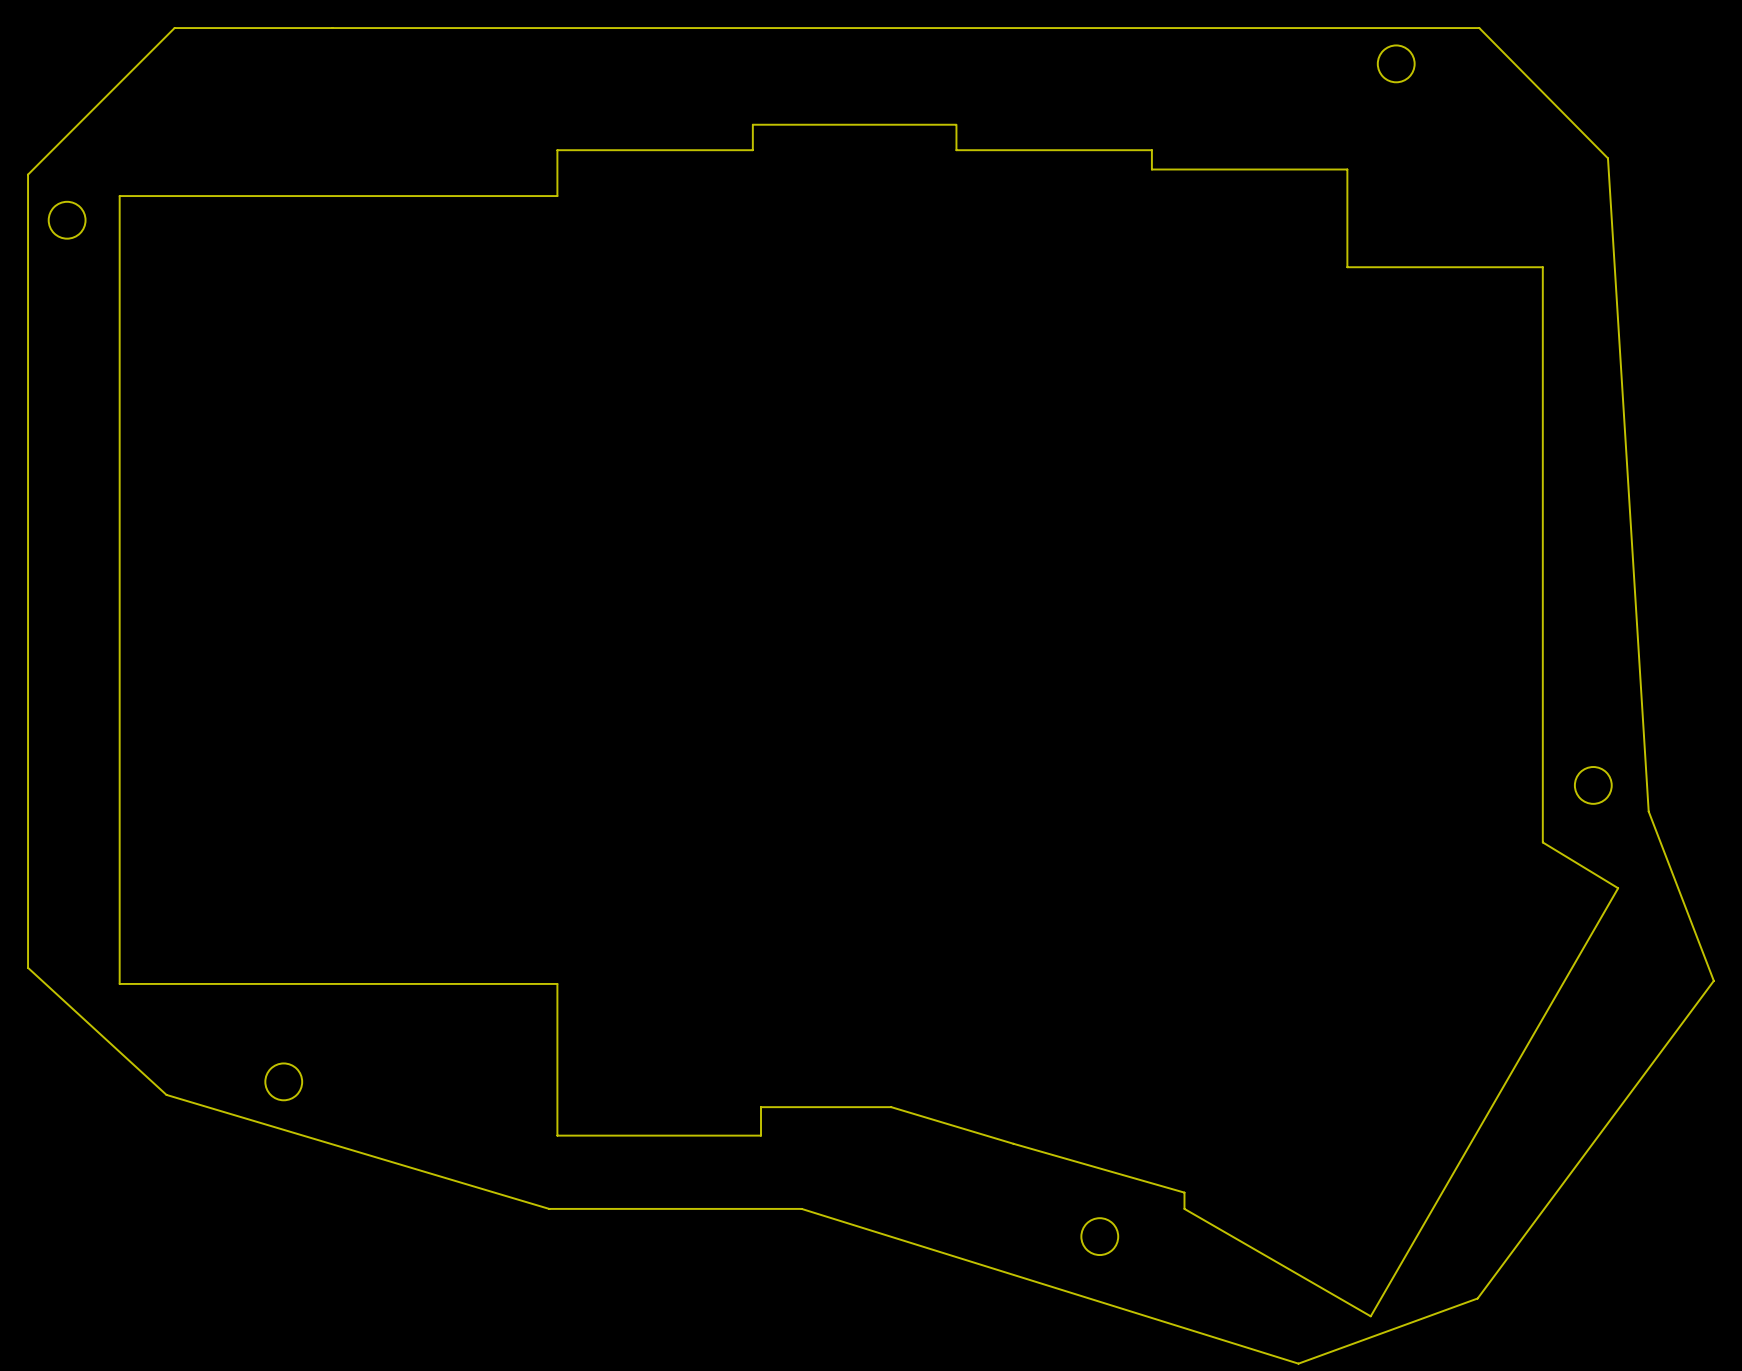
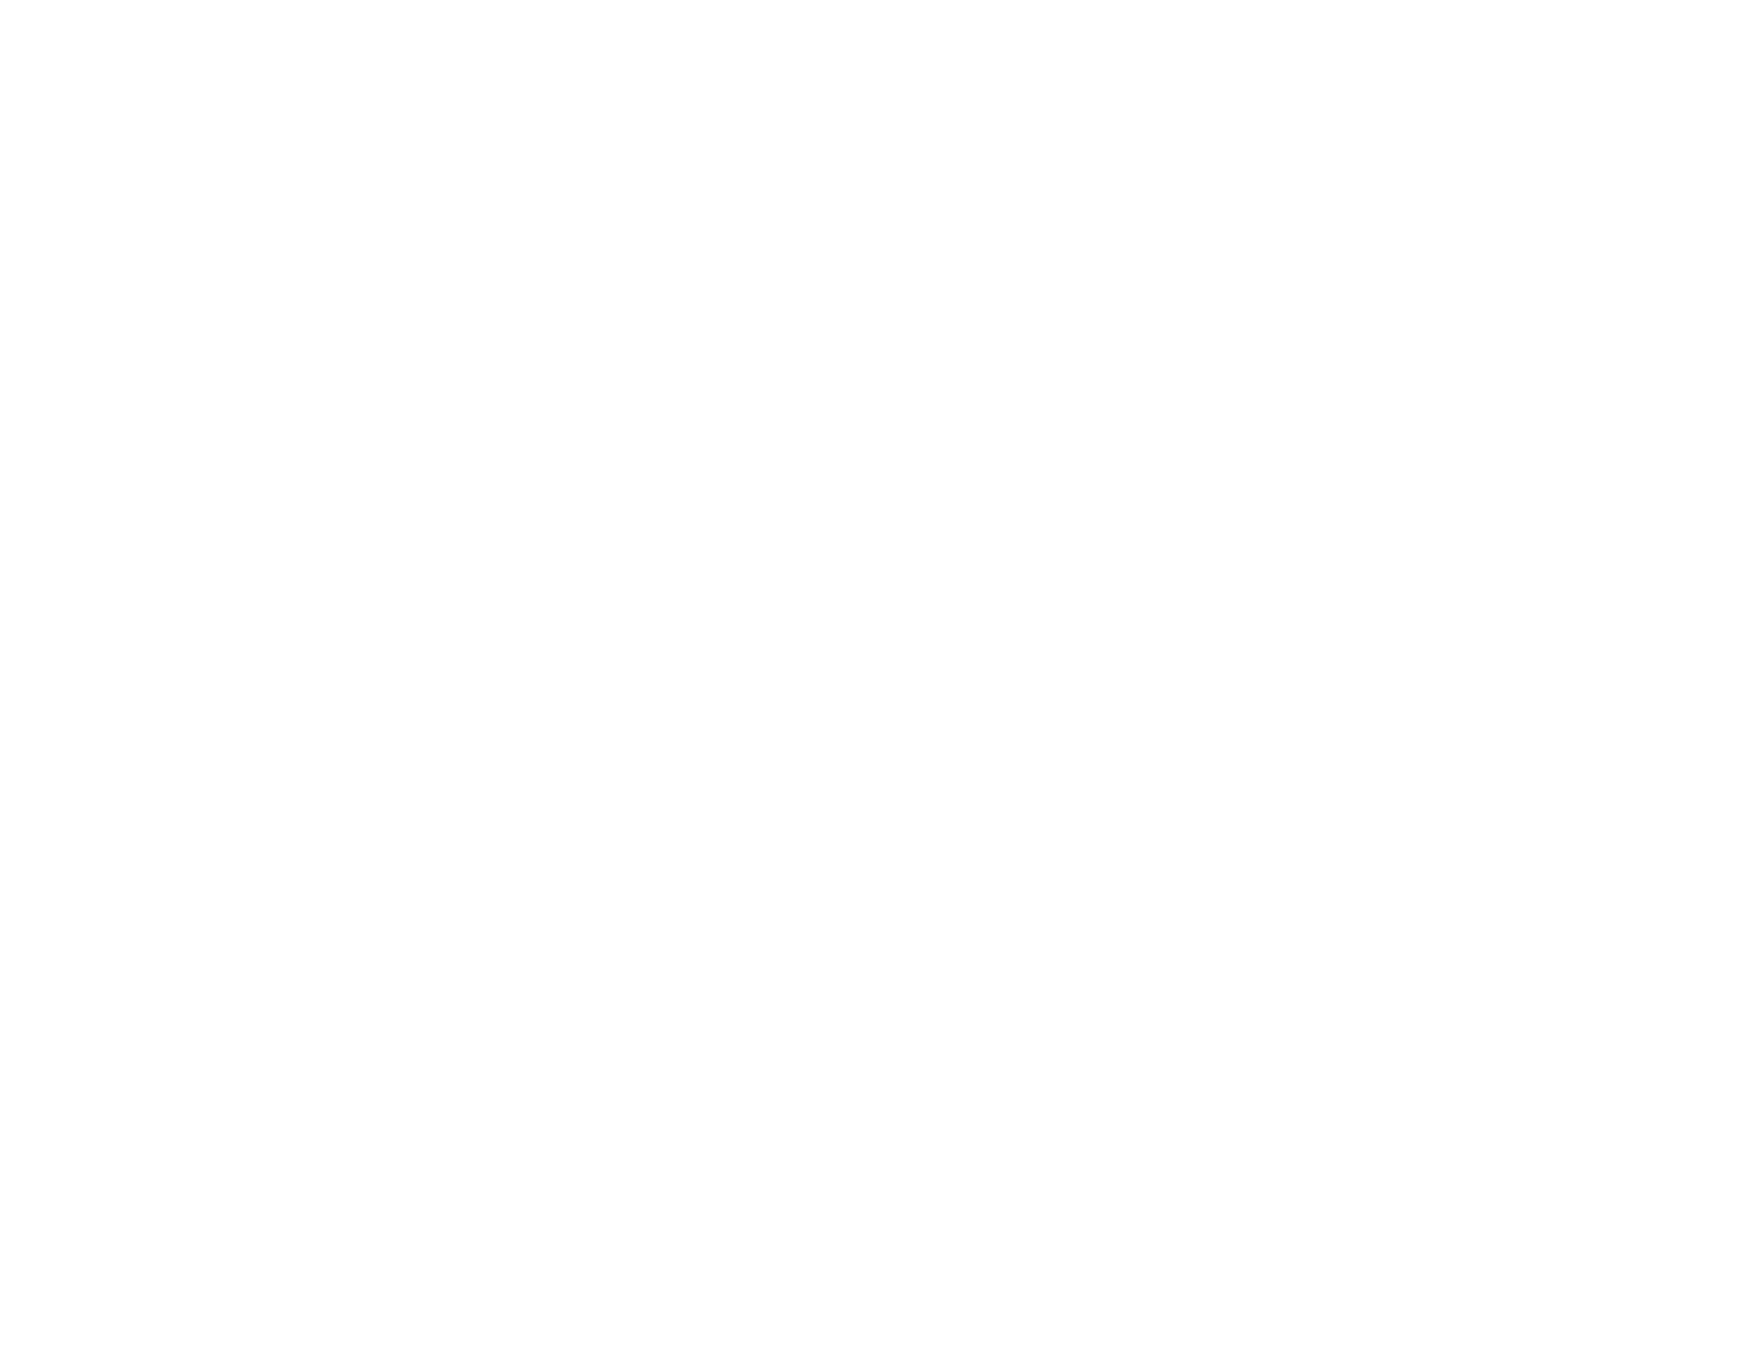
board edge: (174, 28) (28, 174) (28, 967) (166, 1094) (549, 1208) (801, 1208) (1298, 1363) (1477, 1298) (1713, 980) (1648, 811) (1607, 158) (1479, 28) (174, 28) -> none
round board edge: [1377, 44, 1416, 83] -> none
board edge: (956, 124) (752, 124) (752, 150) (557, 150) (557, 196) (119, 196) (119, 983) (557, 983) (557, 1135) (761, 1135) (761, 1107) (891, 1107) (1184, 1192) (1184, 1208) (1370, 1316) (1618, 888) (1542, 842) (1542, 267) (1347, 267) (1347, 169) (1151, 169) (1151, 150) (956, 150) (956, 125) -> none
round board edge: [48, 201, 87, 240] -> none
round board edge: [1574, 766, 1613, 805] -> none
round board edge: [264, 1062, 303, 1101] -> none
round board edge: [1080, 1217, 1119, 1256] -> none

